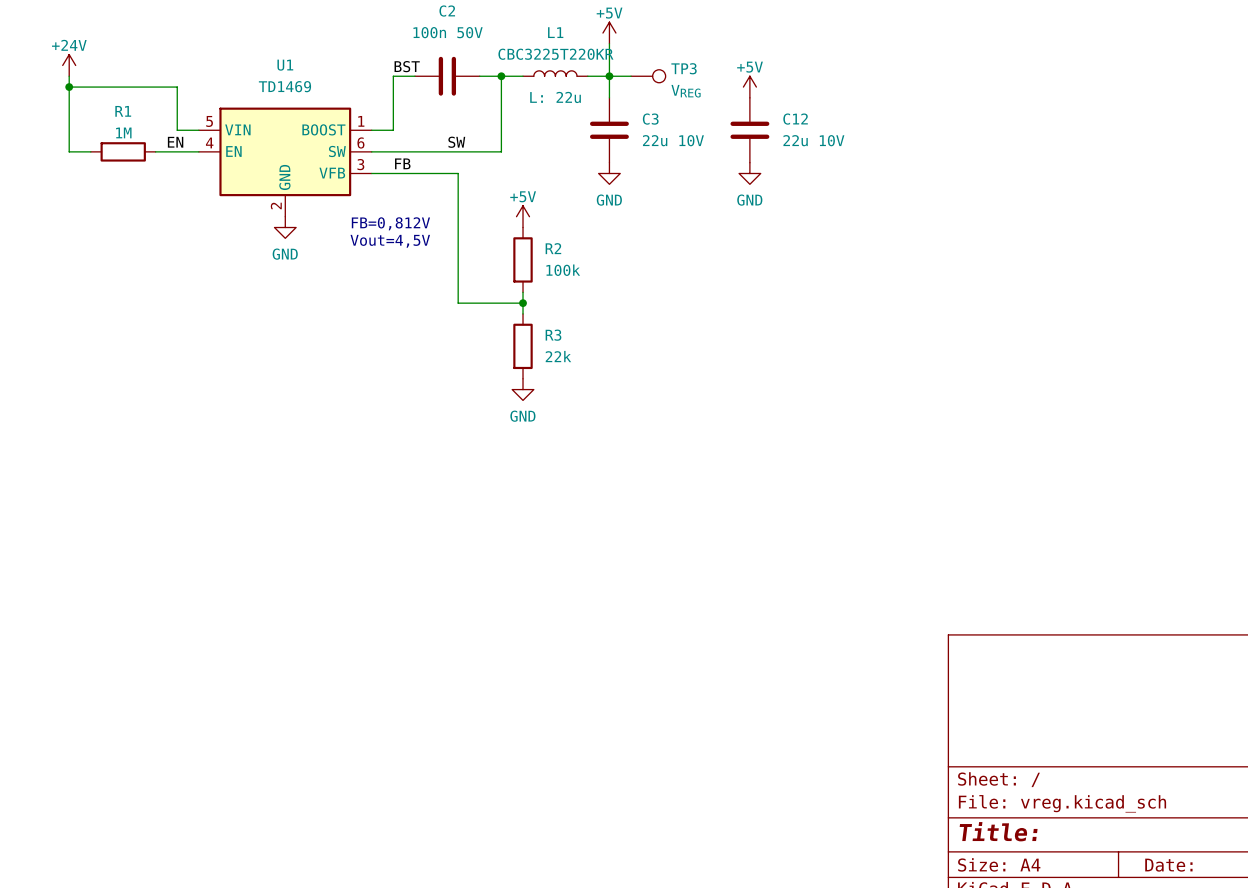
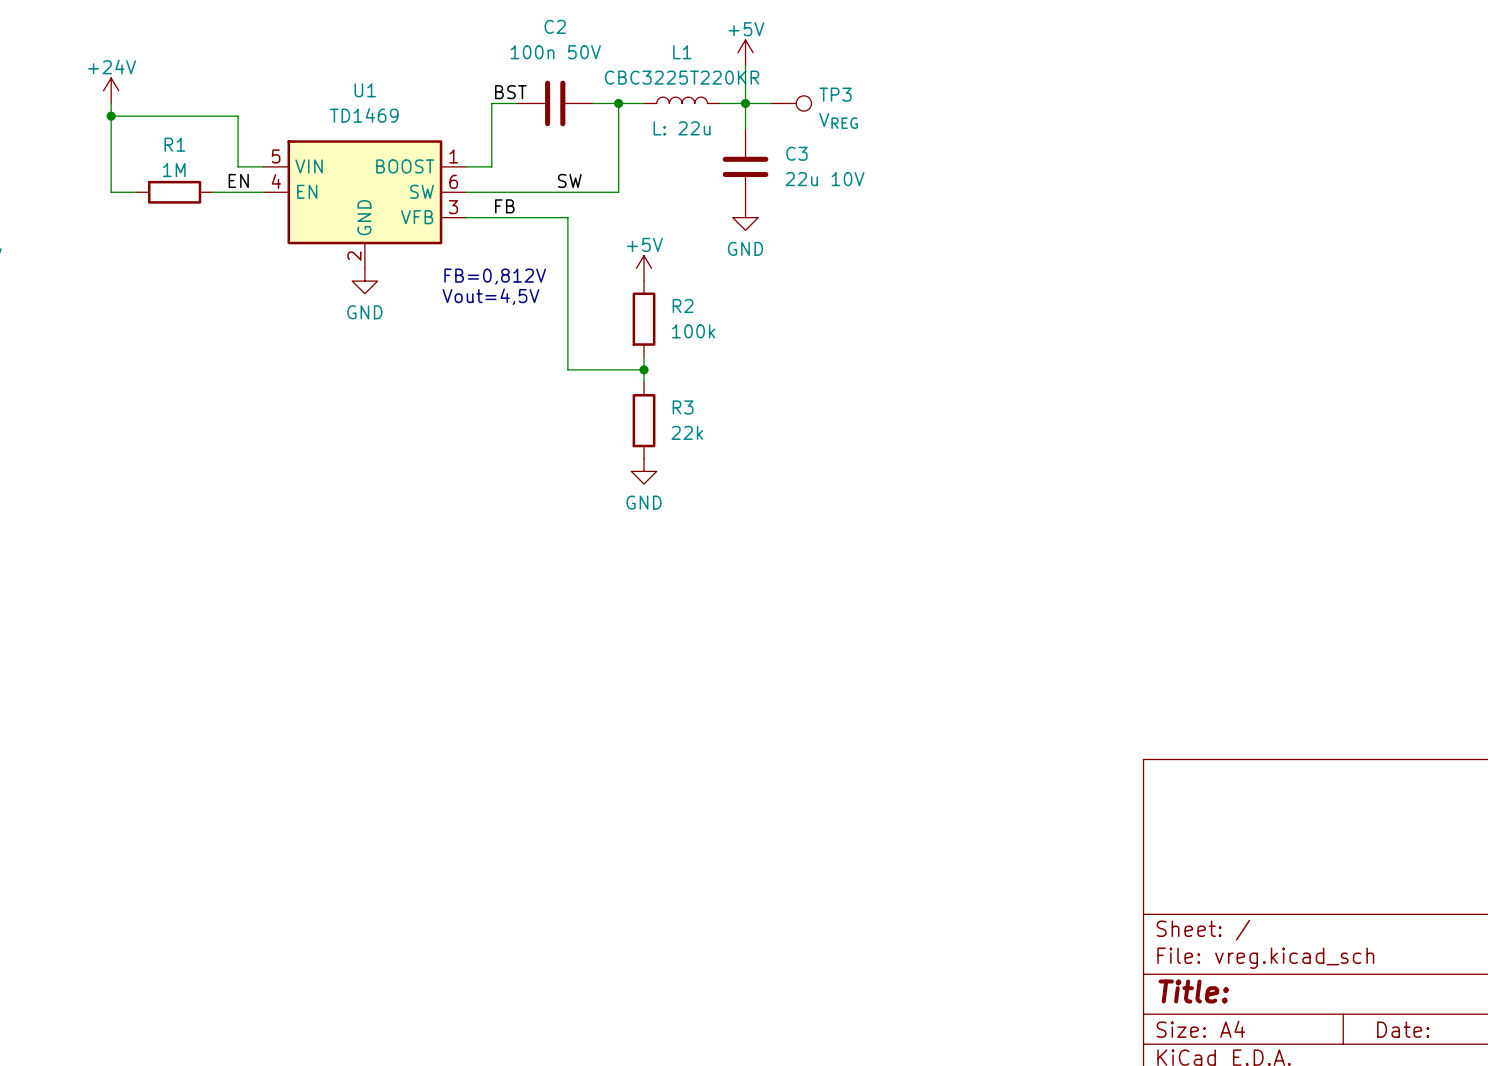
power symbol: +5V (749, 87) -> none
C12: 22u 10V (749, 130) -> none
power symbol: GND (749, 173) -> none

